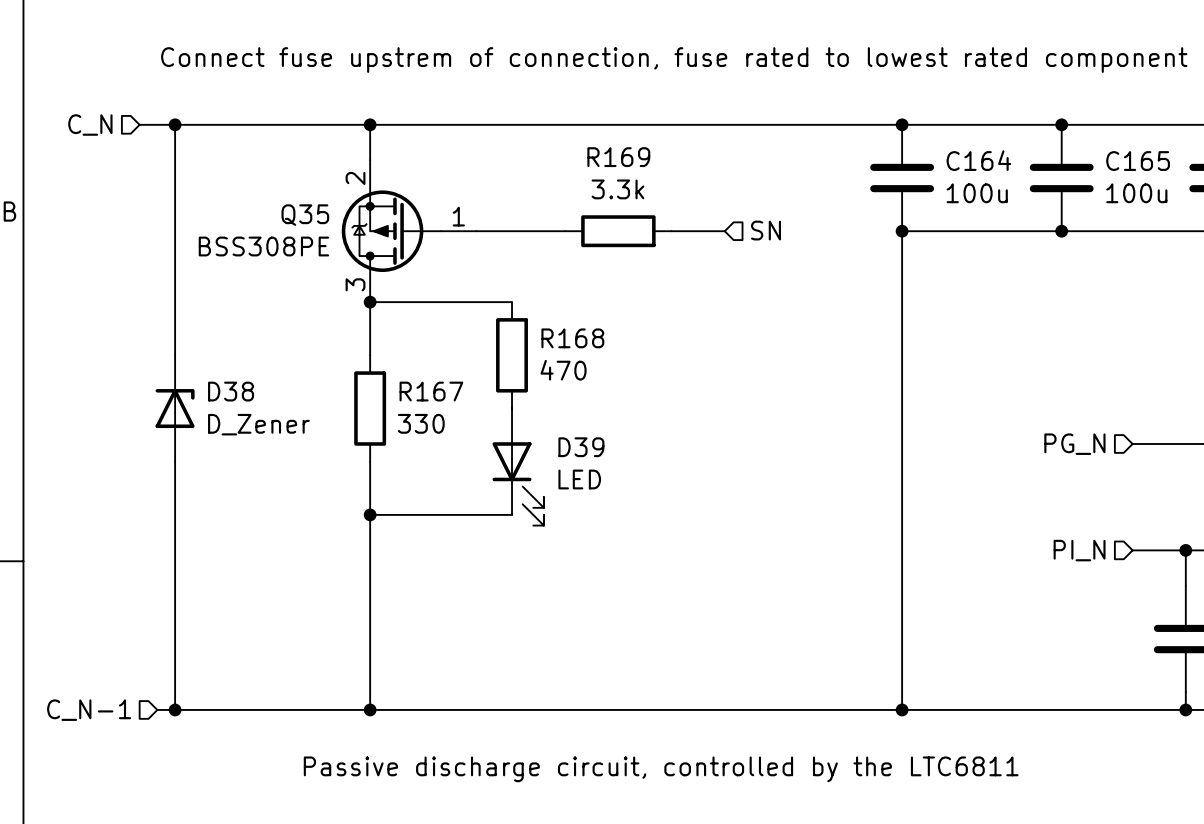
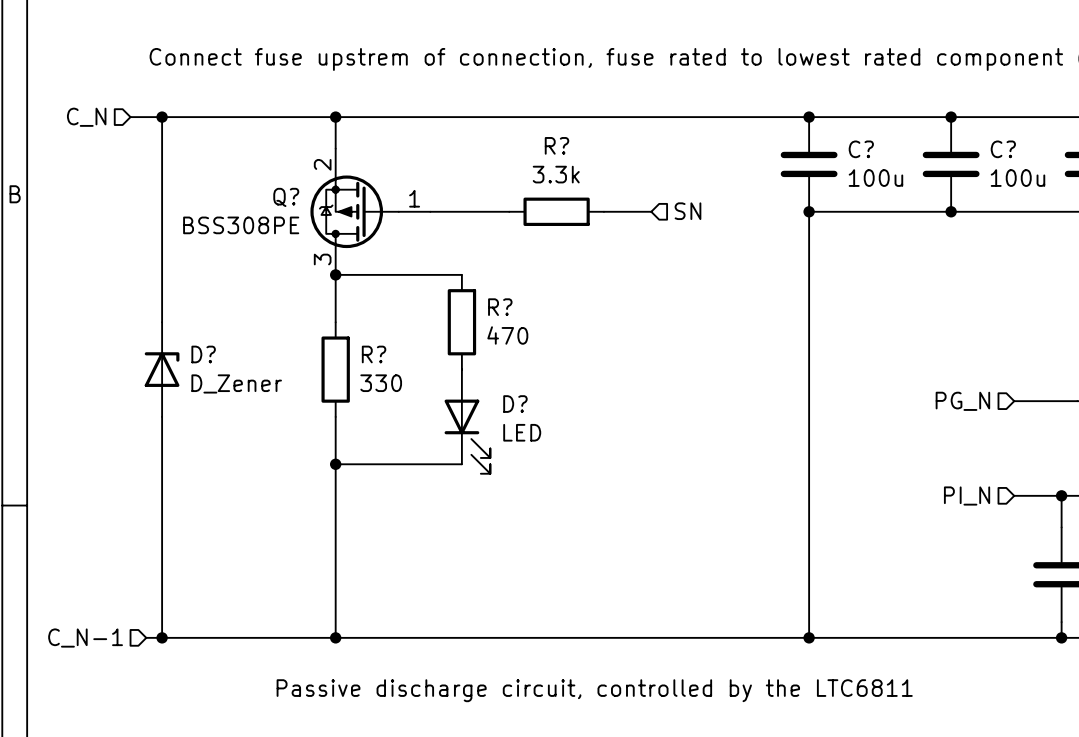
R169 name: R169 (618, 157) -> R? (556, 145)
C164 name: C164 (978, 160) -> C? (861, 149)
C165 name: C165 (1138, 161) -> C? (1003, 149)
Q35 name: Q35 (305, 215) -> Q? (286, 197)
R168 name: R168 (572, 338) -> R? (500, 307)
D38 name: D38 (231, 391) -> D? (203, 354)
R167 name: R167 (431, 391) -> R? (374, 354)
D39 name: D39 (581, 447) -> D? (515, 404)

